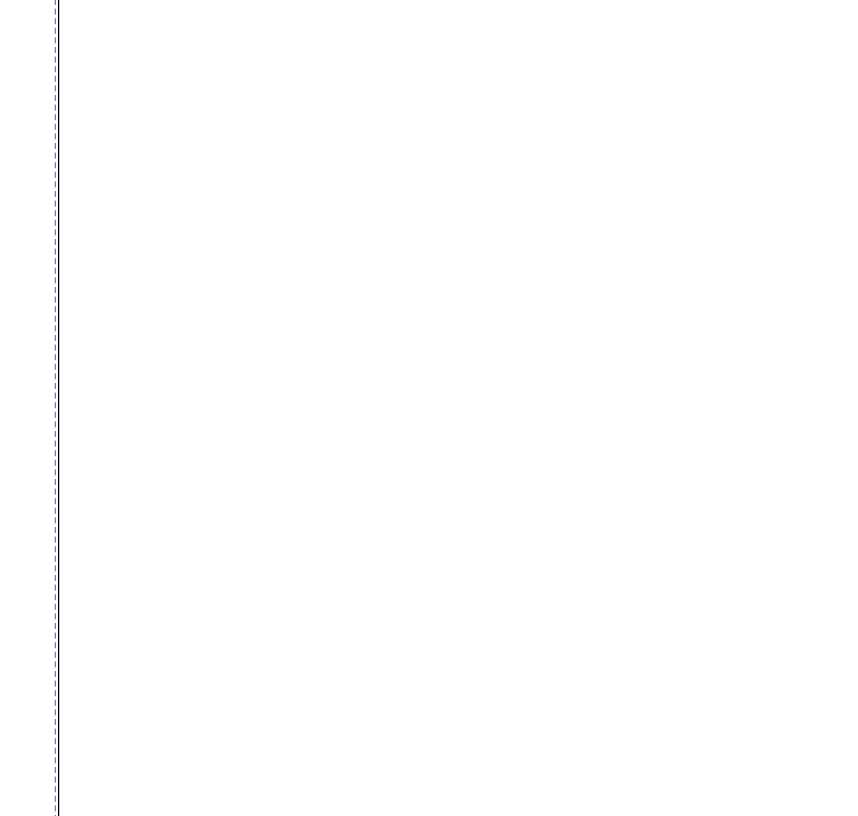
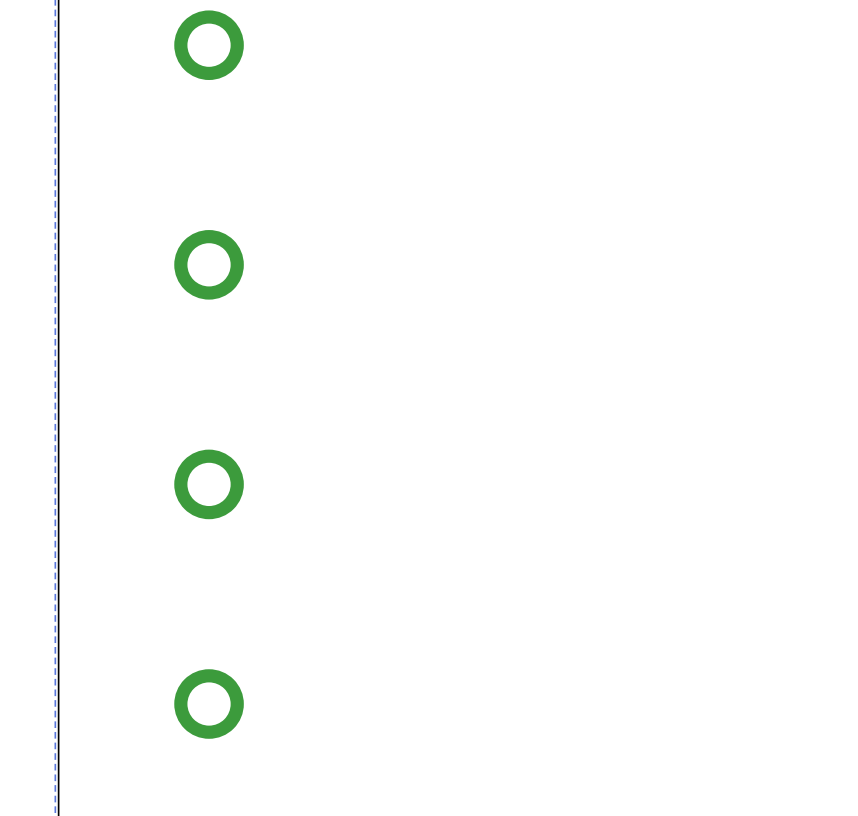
via: none -> (209, 45)
via: none -> (209, 264)
via: none -> (209, 484)
via: none -> (209, 704)

